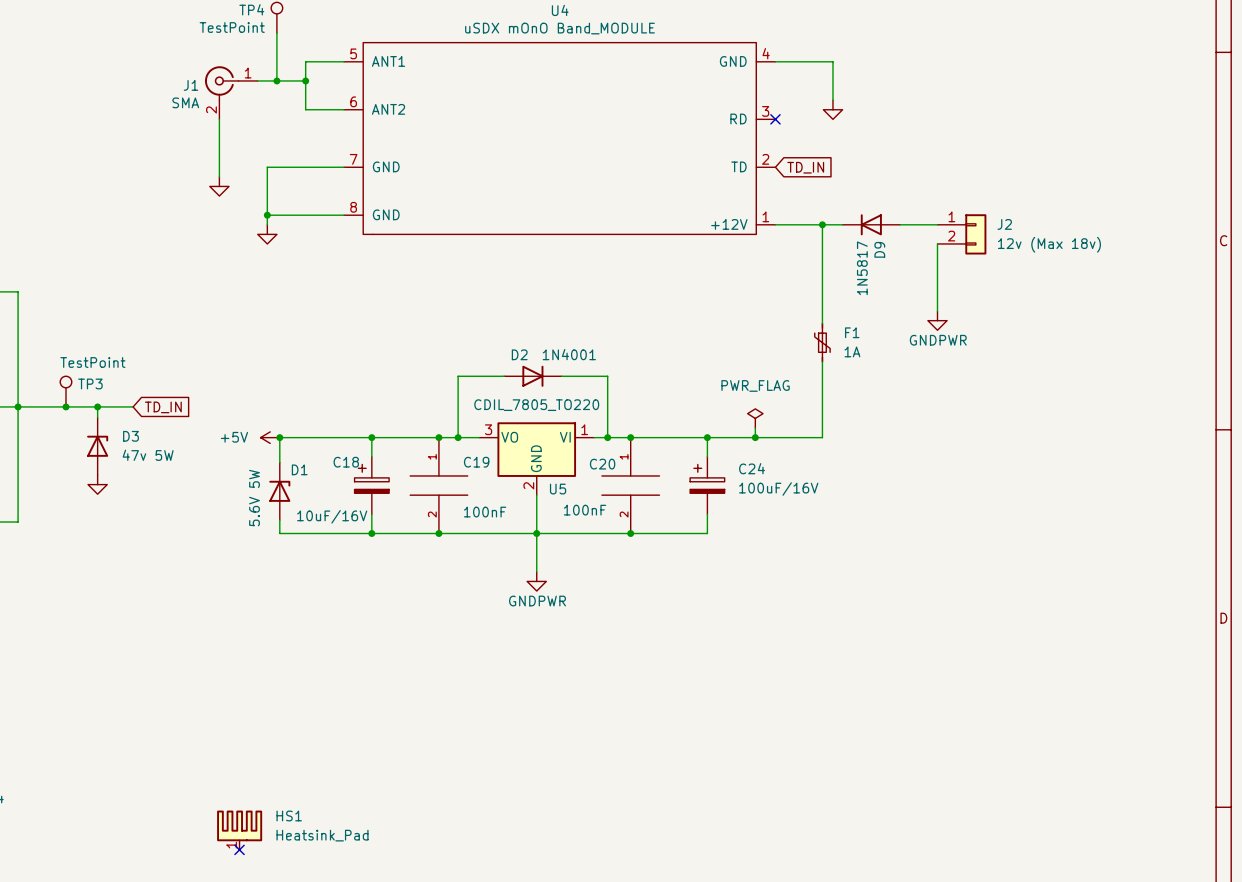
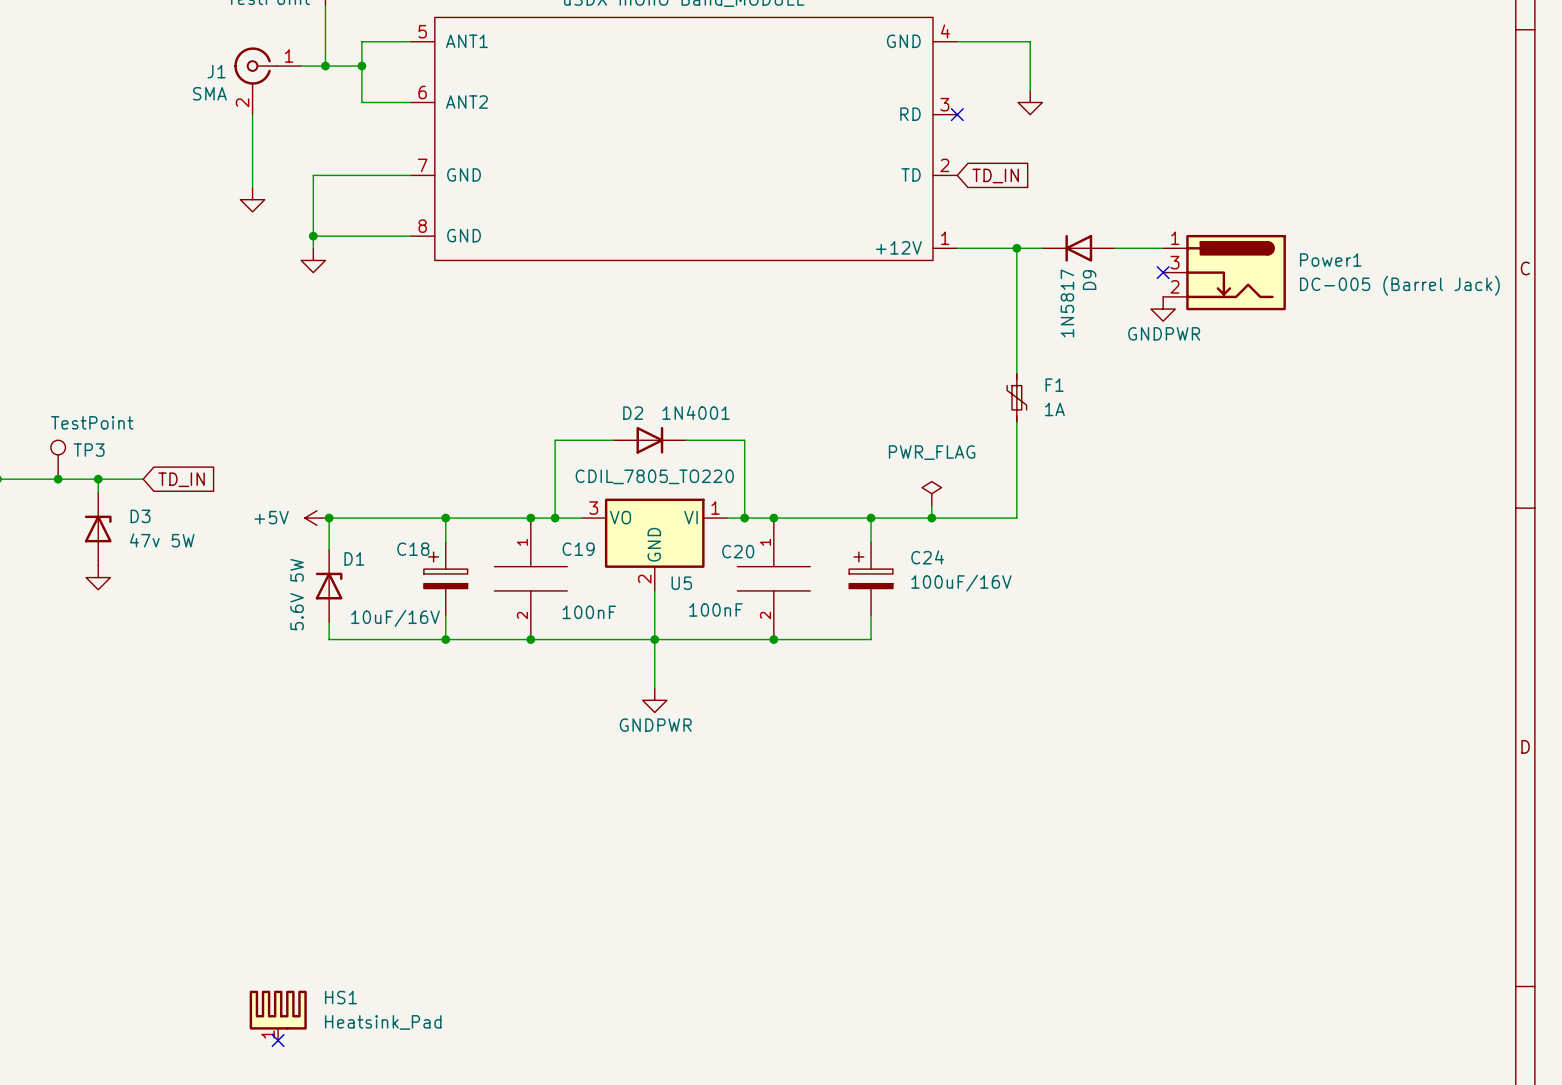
J2: 12v (Max 18v) (961, 234) -> none
wire: (937, 243) (937, 311) -> none
no-connect mark: none -> (1163, 272)
Power1: none -> DC-005 (Barrel Jack) (1224, 272)
power symbol position: GNDPWR (937, 320) -> GNDPWR (1163, 309)

